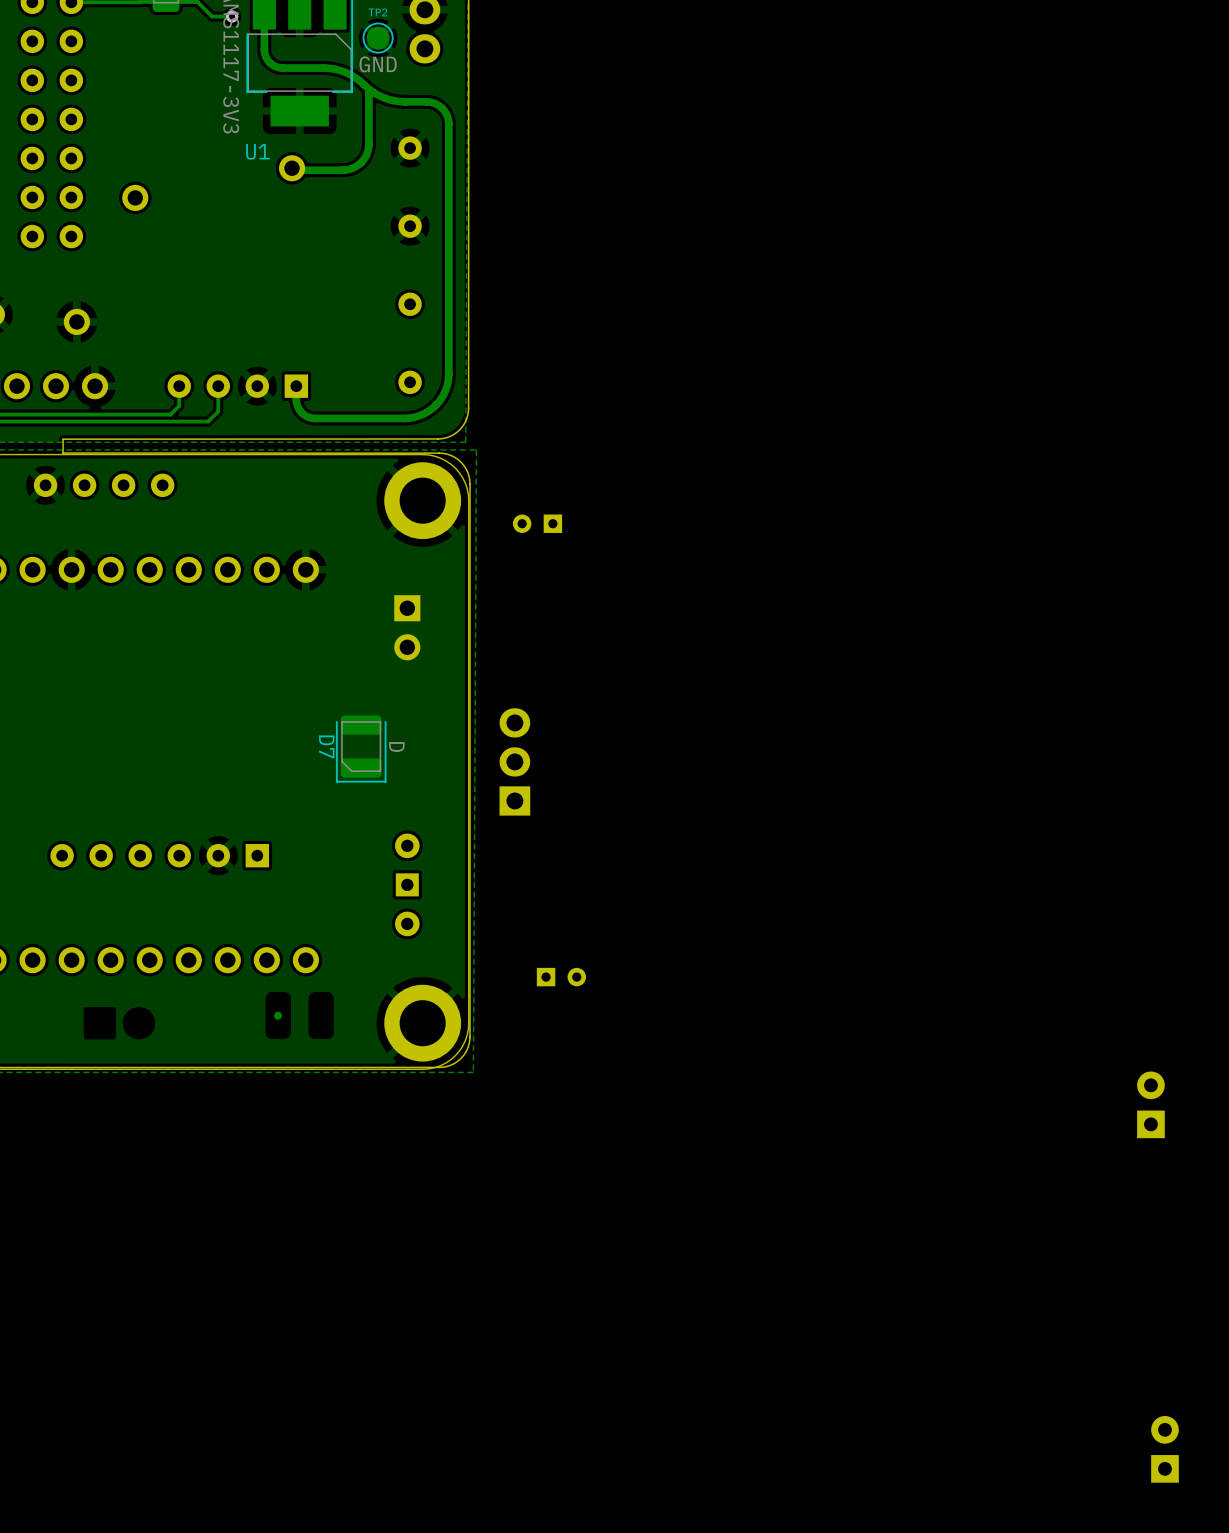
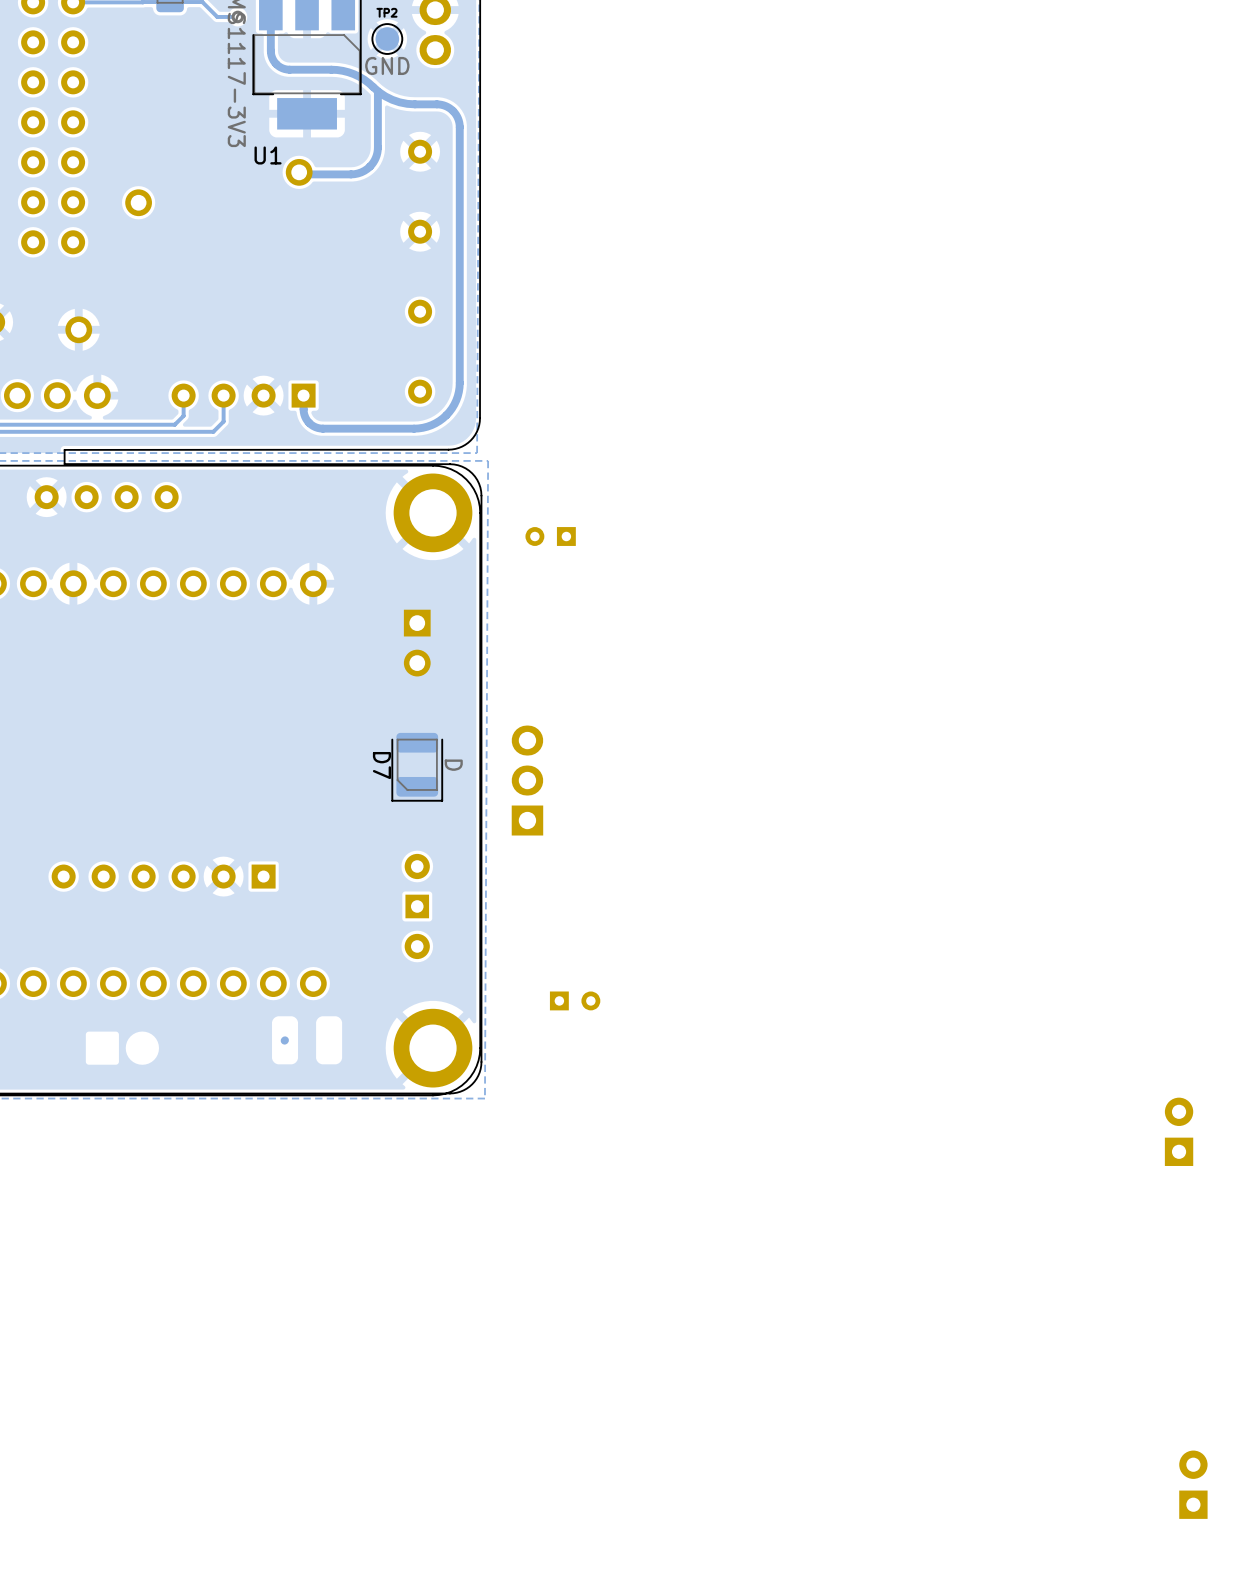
D7 position: (361, 749) -> (417, 767)

